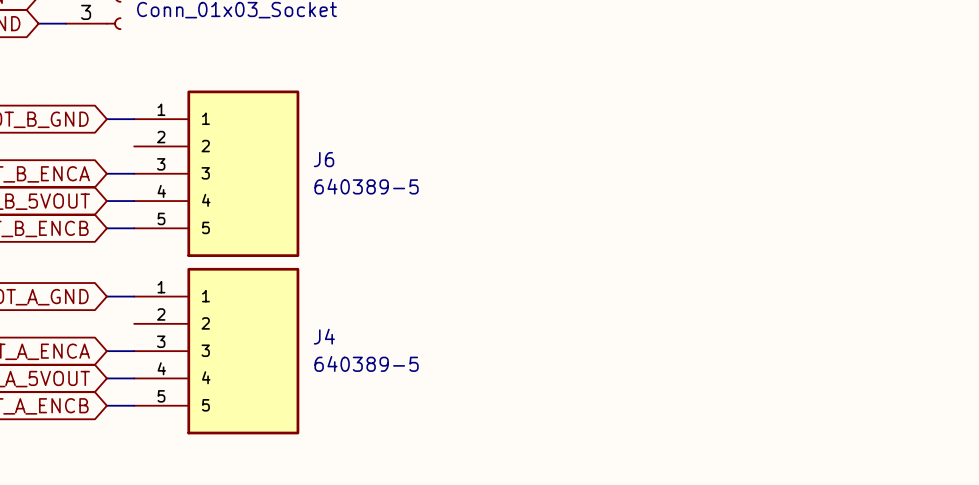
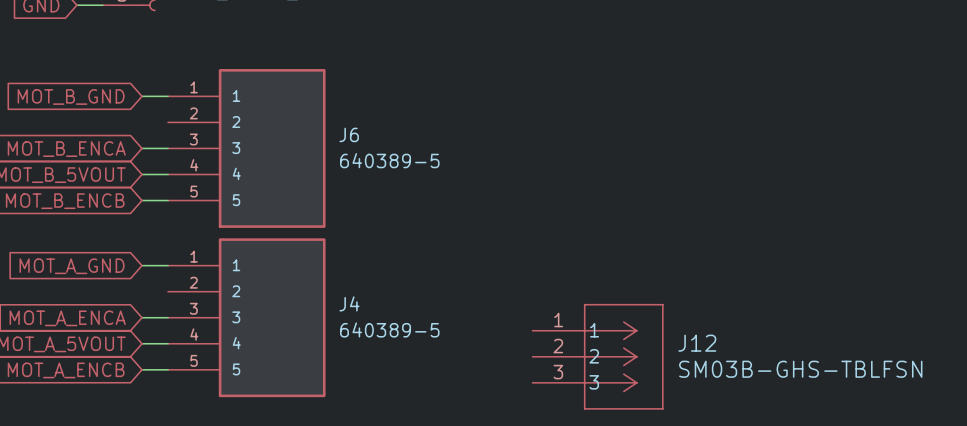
J12: none -> SM03B-GHS-TBLFSN (598, 356)

